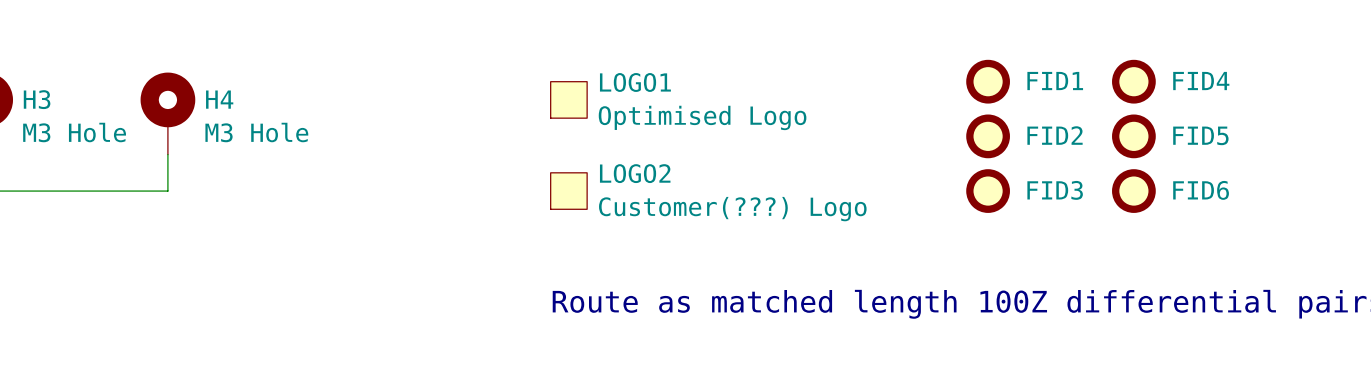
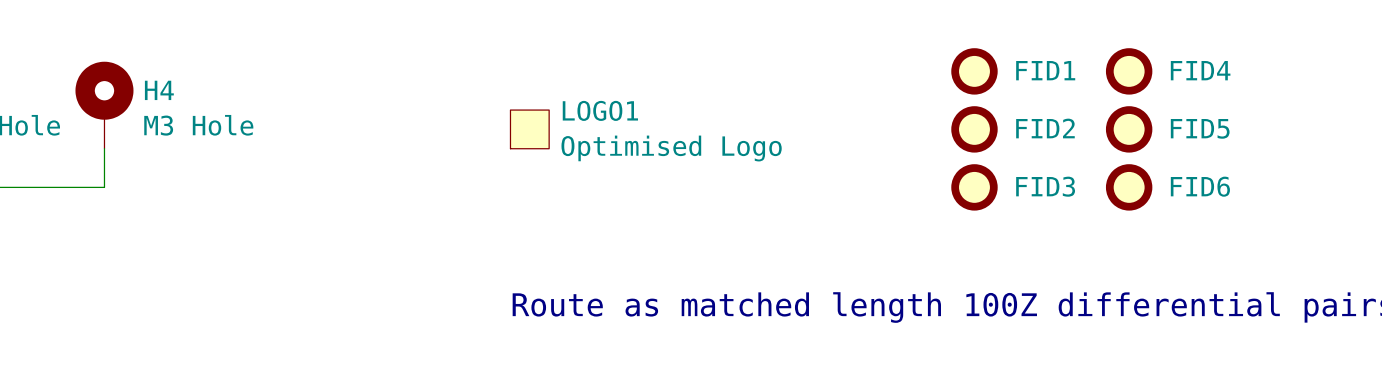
LOGO1 position: (568, 99) -> (529, 129)
LOGO2: Customer(???) Logo (568, 191) -> none

